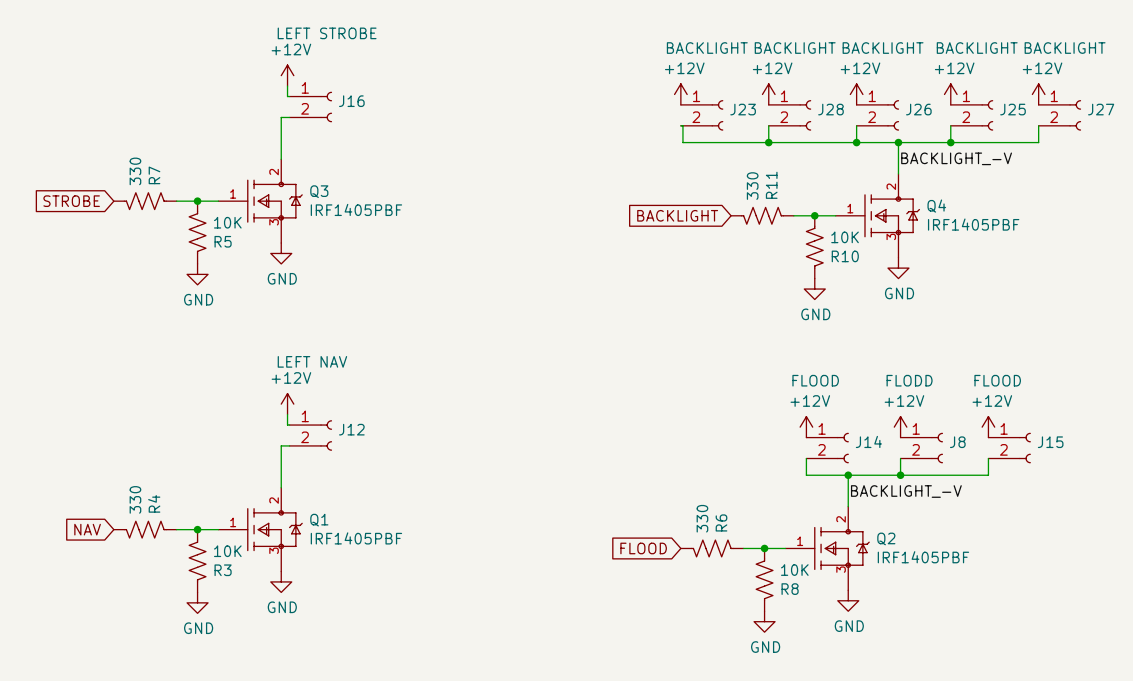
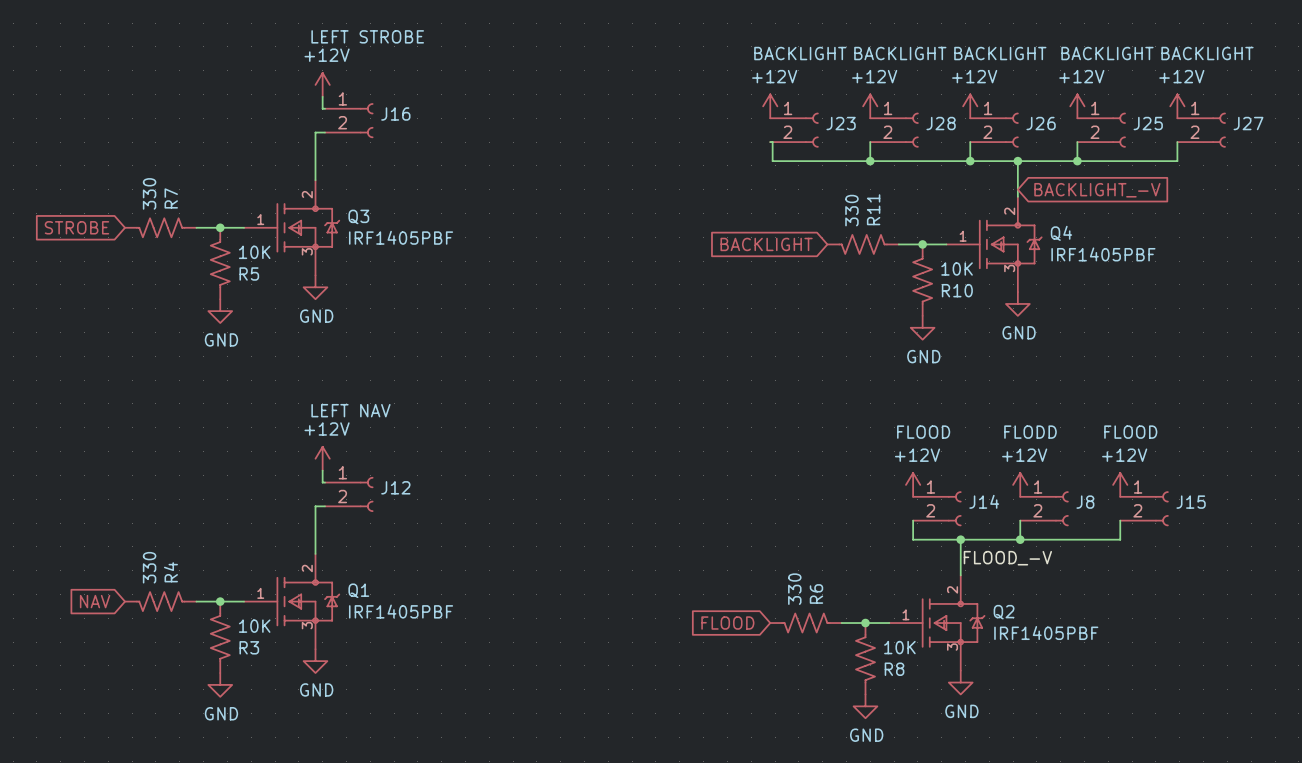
label: BACKLIGHT_-V (956, 158) -> none
global label: none -> BACKLIGHT_-V (1097, 190)
label: BACKLIGHT_-V (906, 491) -> FLOOD_-V (1007, 558)

